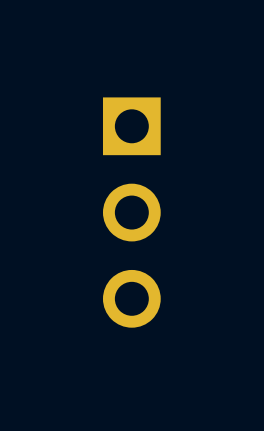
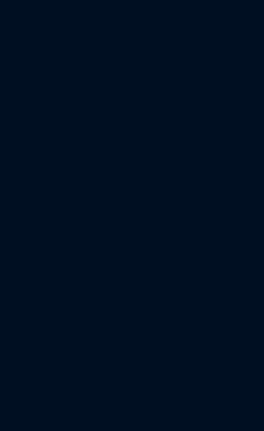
part: (131, 212) -> none

